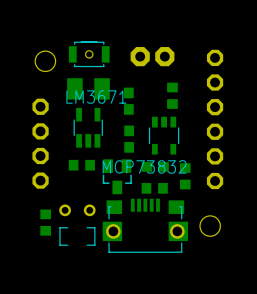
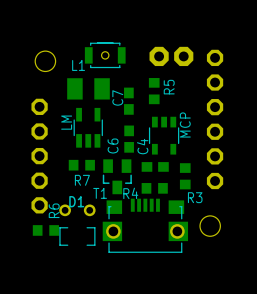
part position: (89, 54) -> (105, 55)
part position: (152, 56) -> (171, 56)
L1 name: none -> L1 (78, 65)
R5: none -> (154, 91)
part: (172, 95) -> none
LM3671 name: LM3671 (96, 97) -> LM (66, 122)
C7 name: none -> C7 (117, 97)
part: (40, 143) -> none
C6 name: none -> C6 (113, 146)
C4 name: none -> C4 (142, 146)
part: none -> (39, 156)
MCP73832 name: MCP73832 (144, 166) -> MCP (185, 124)
R7 name: none -> R7 (82, 180)
T1 name: none -> T1 (100, 193)
R4 name: none -> R4 (130, 193)
R3 name: none -> R3 (195, 197)
D1 name: none -> D1 (76, 201)
part: (45, 222) -> none
R6: none -> (45, 230)

